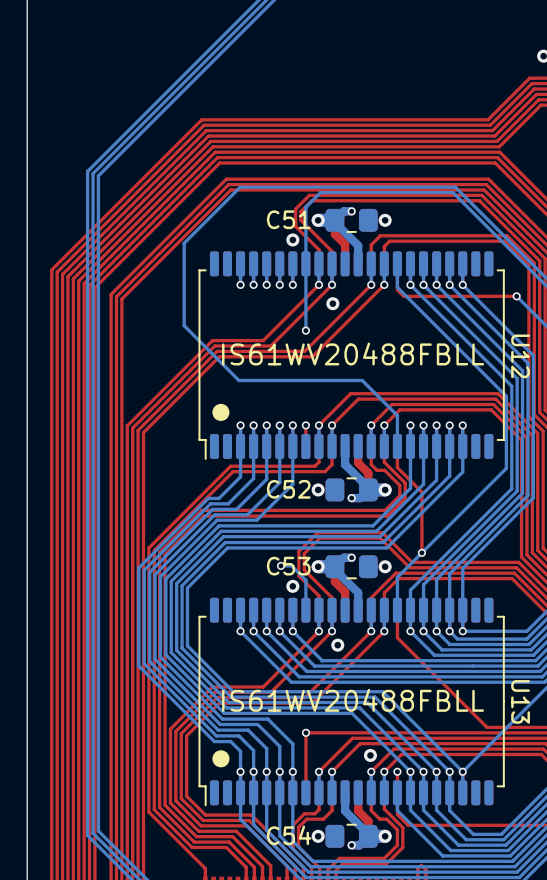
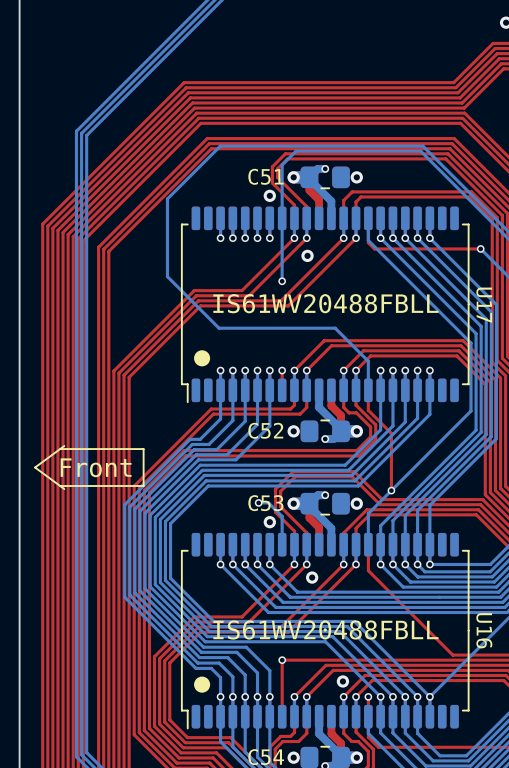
U12 name: U12 (520, 356) -> U17 (484, 305)
line: none -> (64, 445) (35, 467) (64, 489)
line: none -> (60, 449) (143, 449) (143, 485) (60, 486)
text: none -> Front (96, 467)
U13 name: U13 (520, 701) -> U16 (484, 630)

